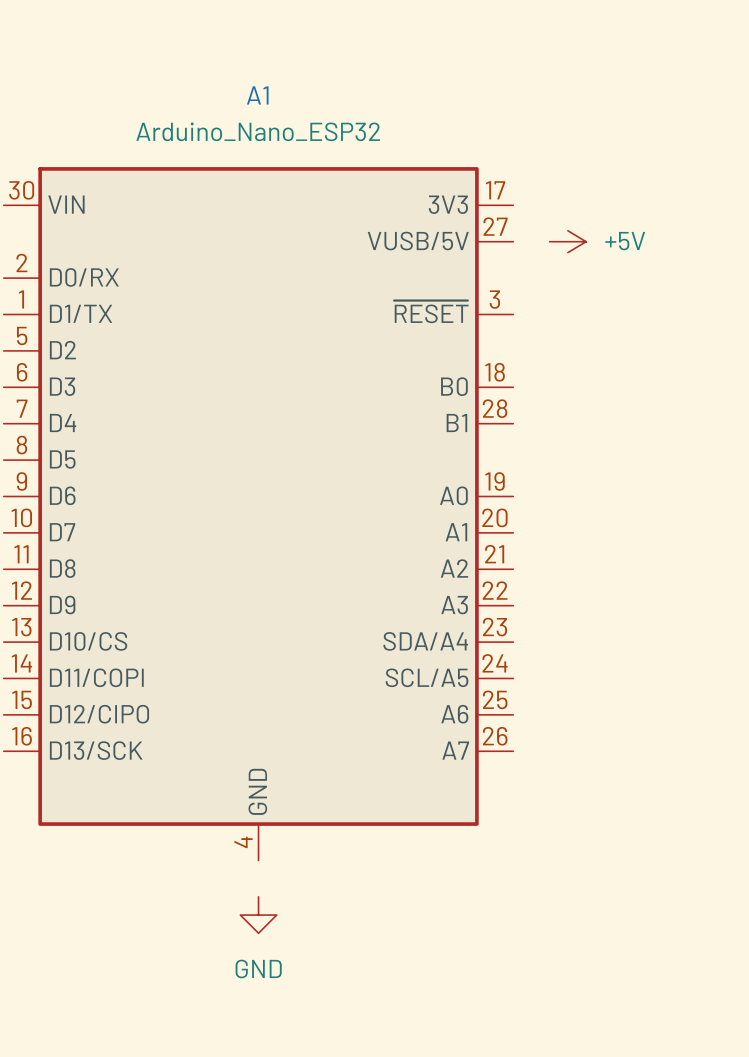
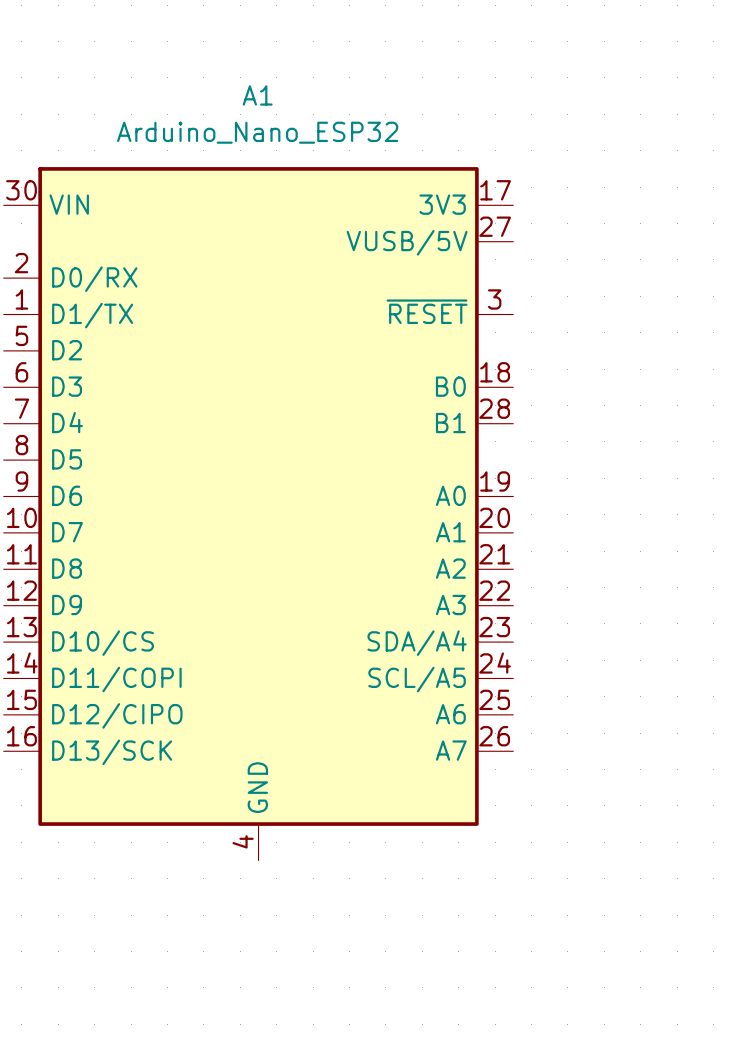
power symbol: +5V (567, 241) -> none
power symbol: GND (258, 915) -> none

